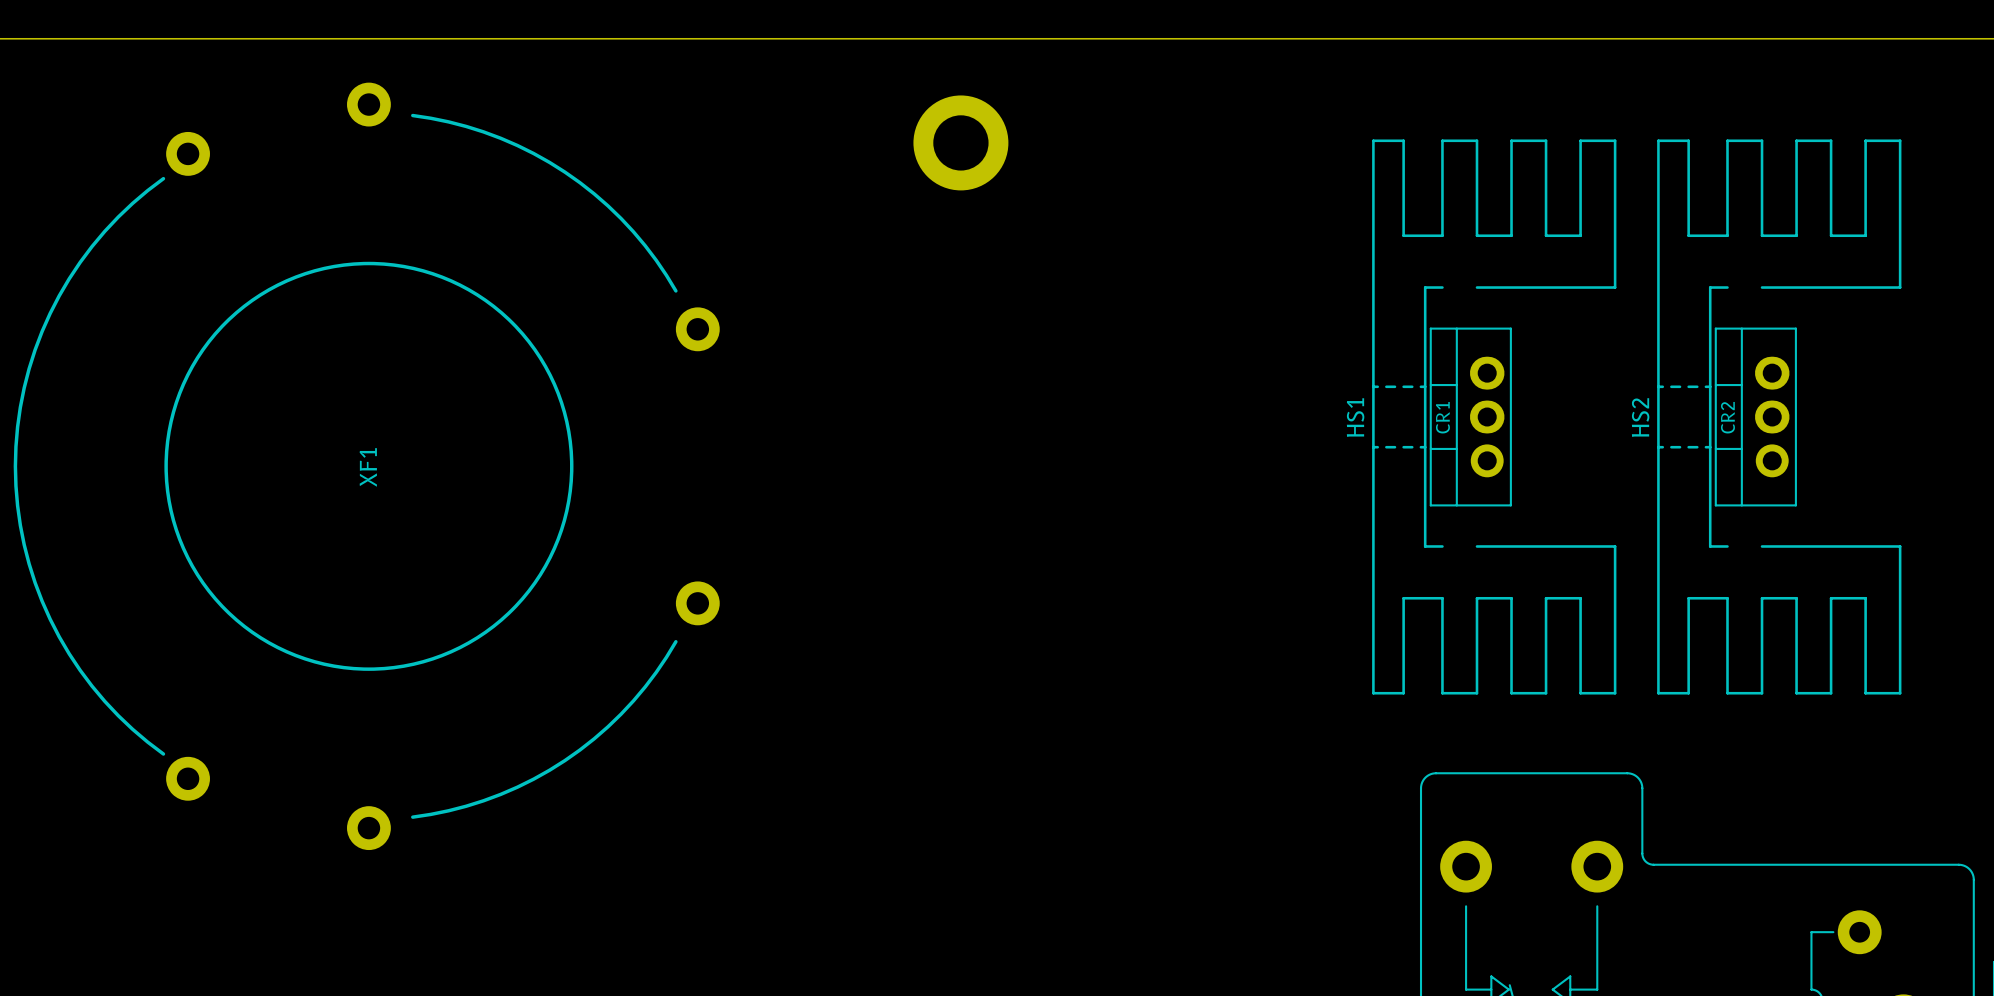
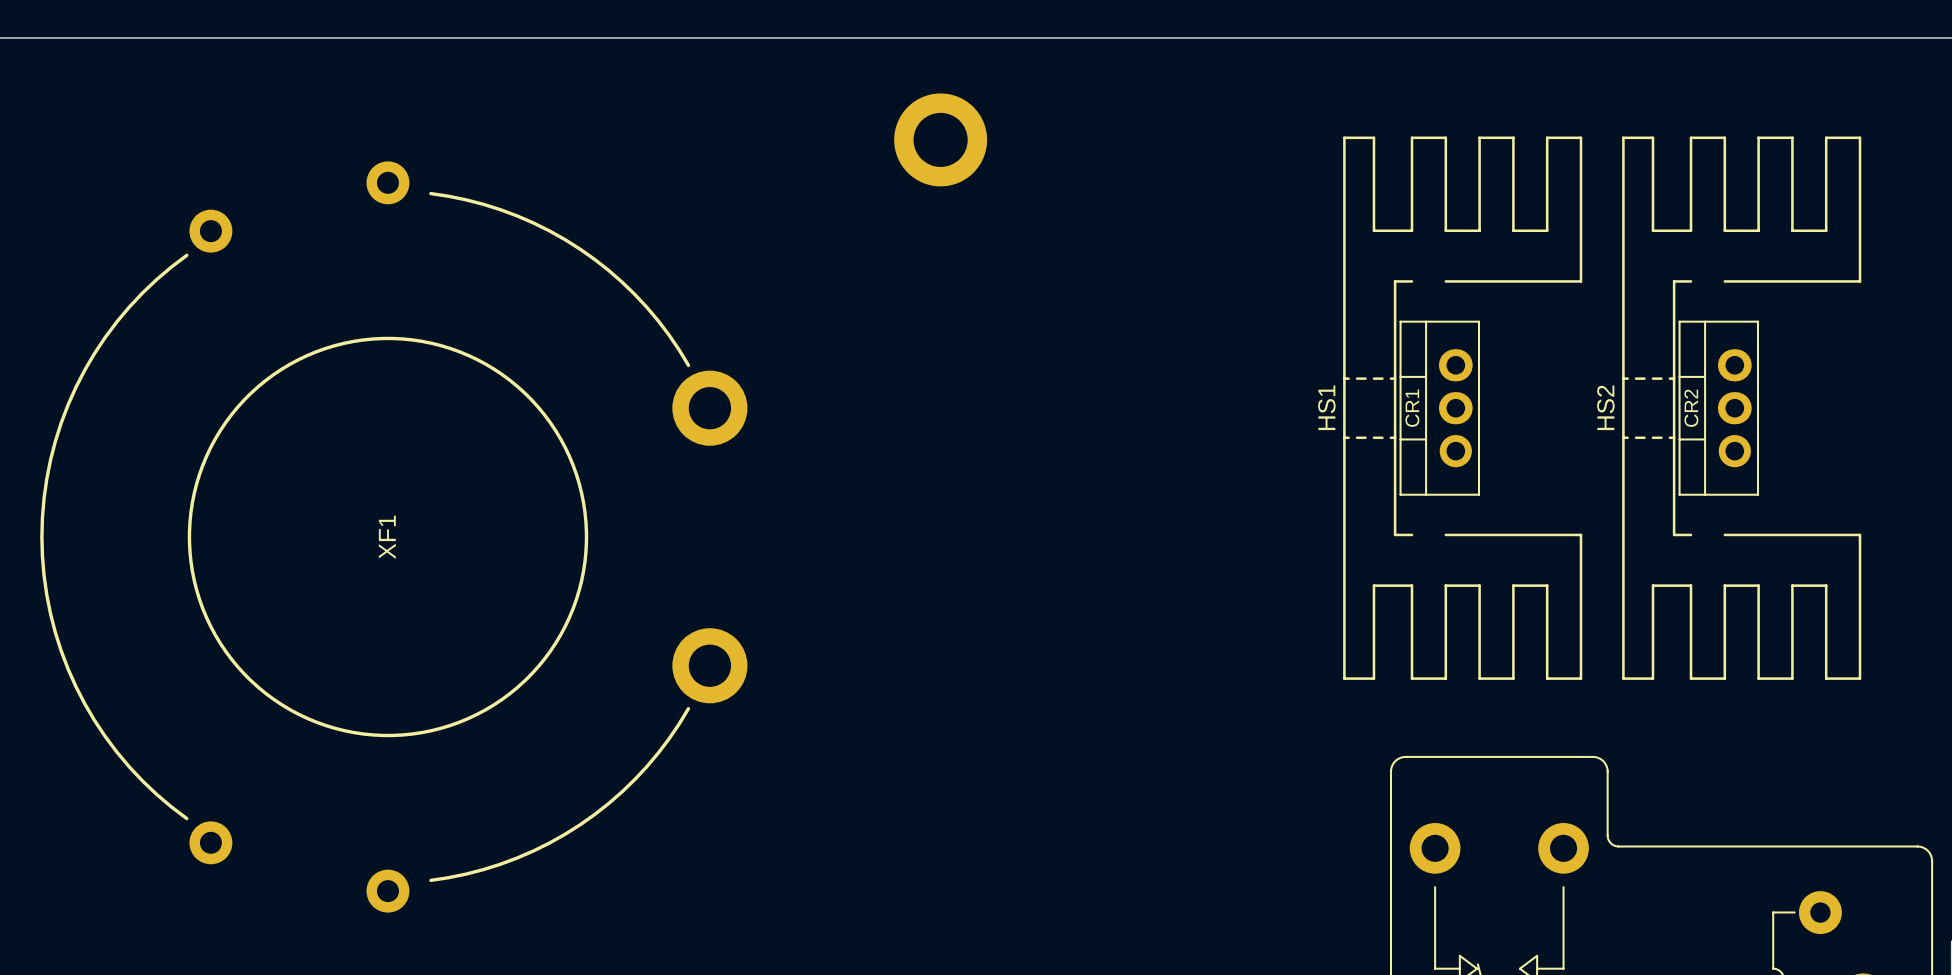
XF1 footprint: [13, 82, 720, 851] -> [40, 161, 748, 913]

